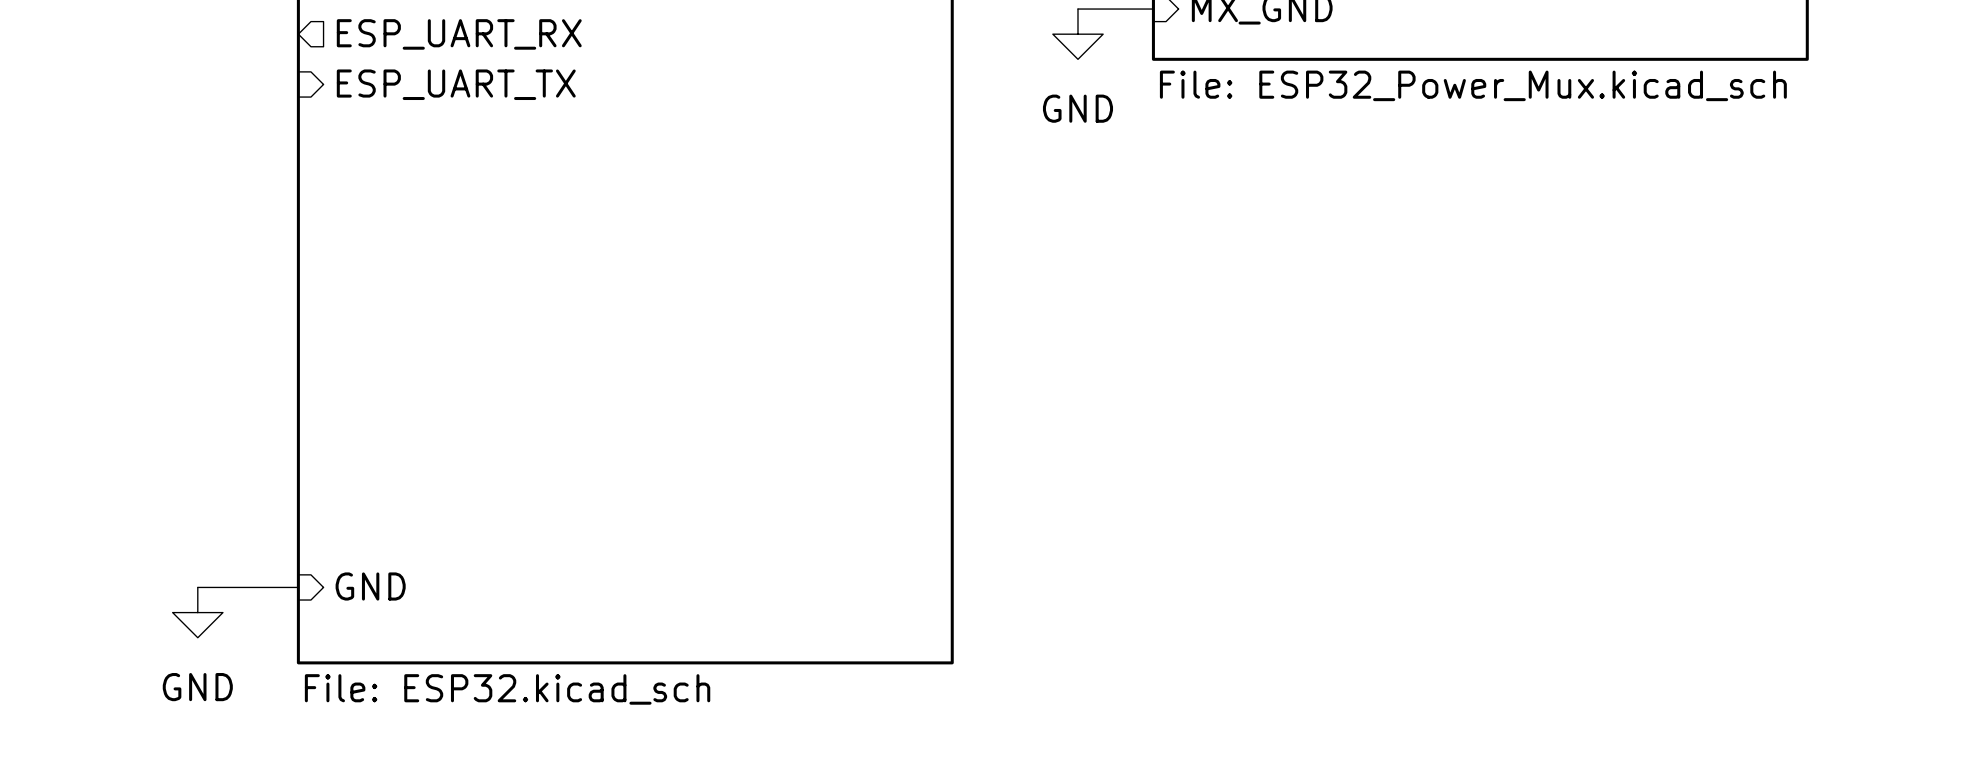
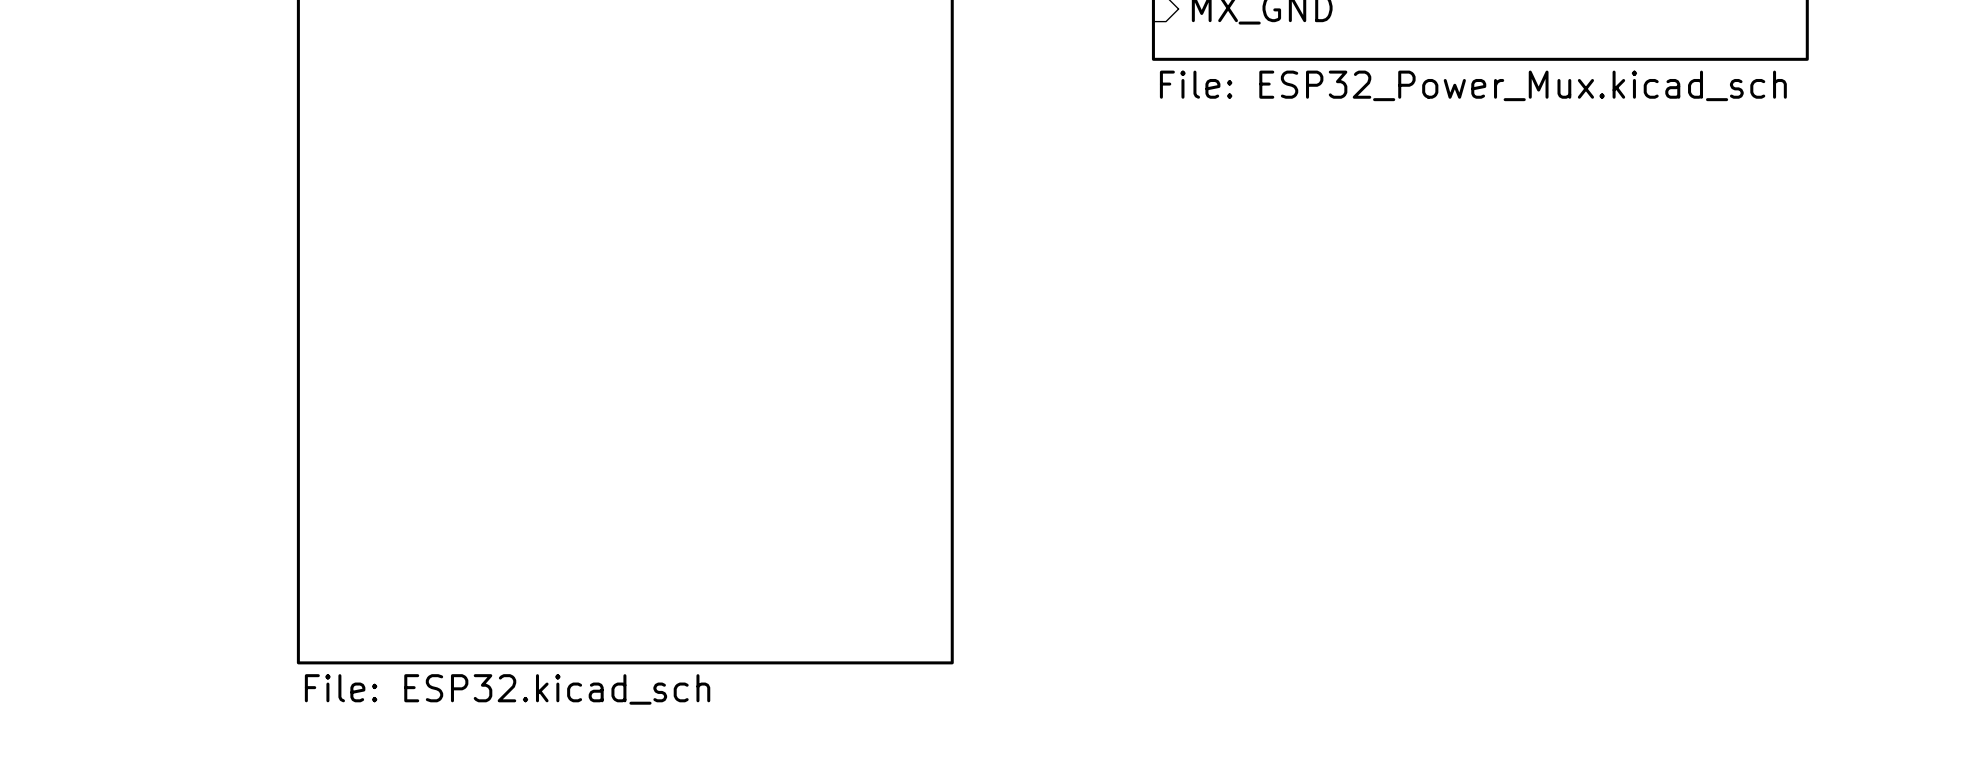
wire: (1077, 9) (1153, 9) -> none
sheet pin: ESP_UART_RX (459, 34) -> none
power symbol: GND (1077, 34) -> none
sheet pin: ESP_UART_TX (456, 84) -> none
sheet pin: GND (370, 586) -> none
wire: (197, 587) (298, 587) -> none
power symbol: GND (197, 612) -> none

